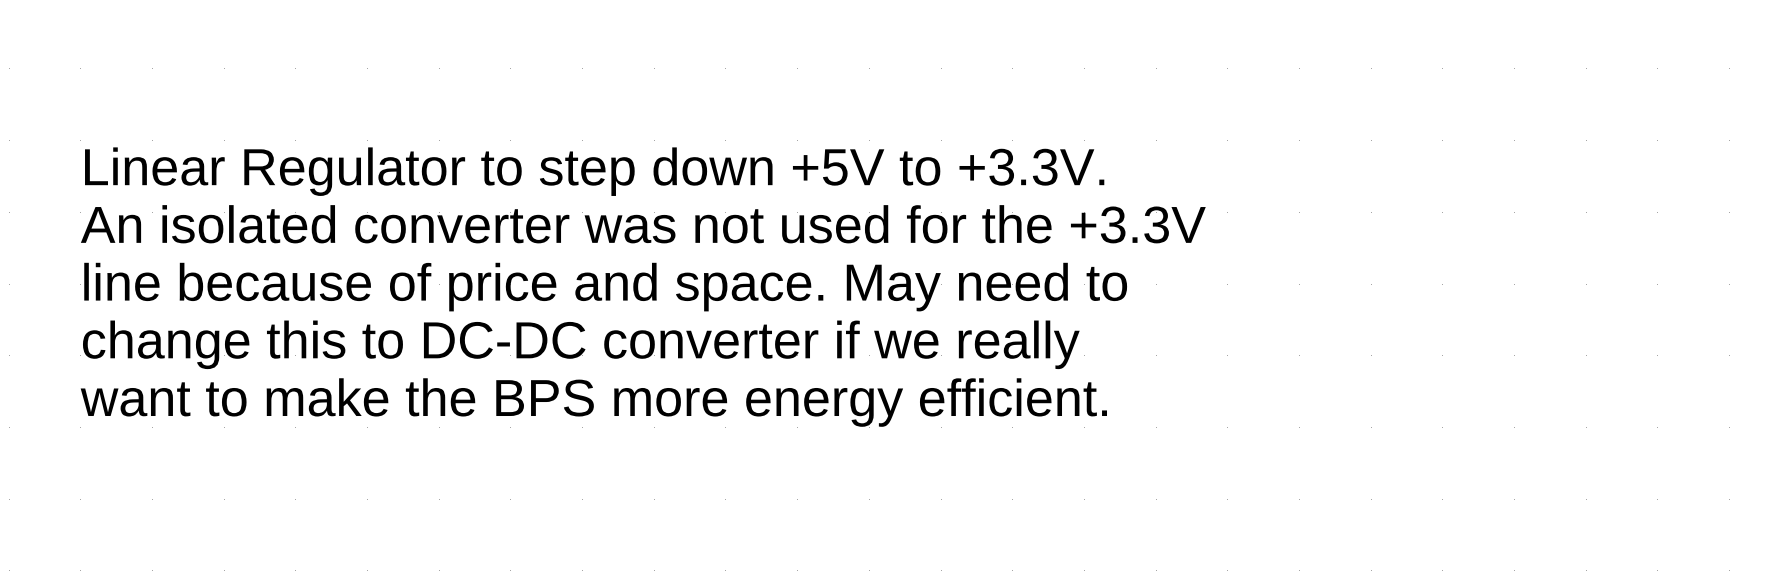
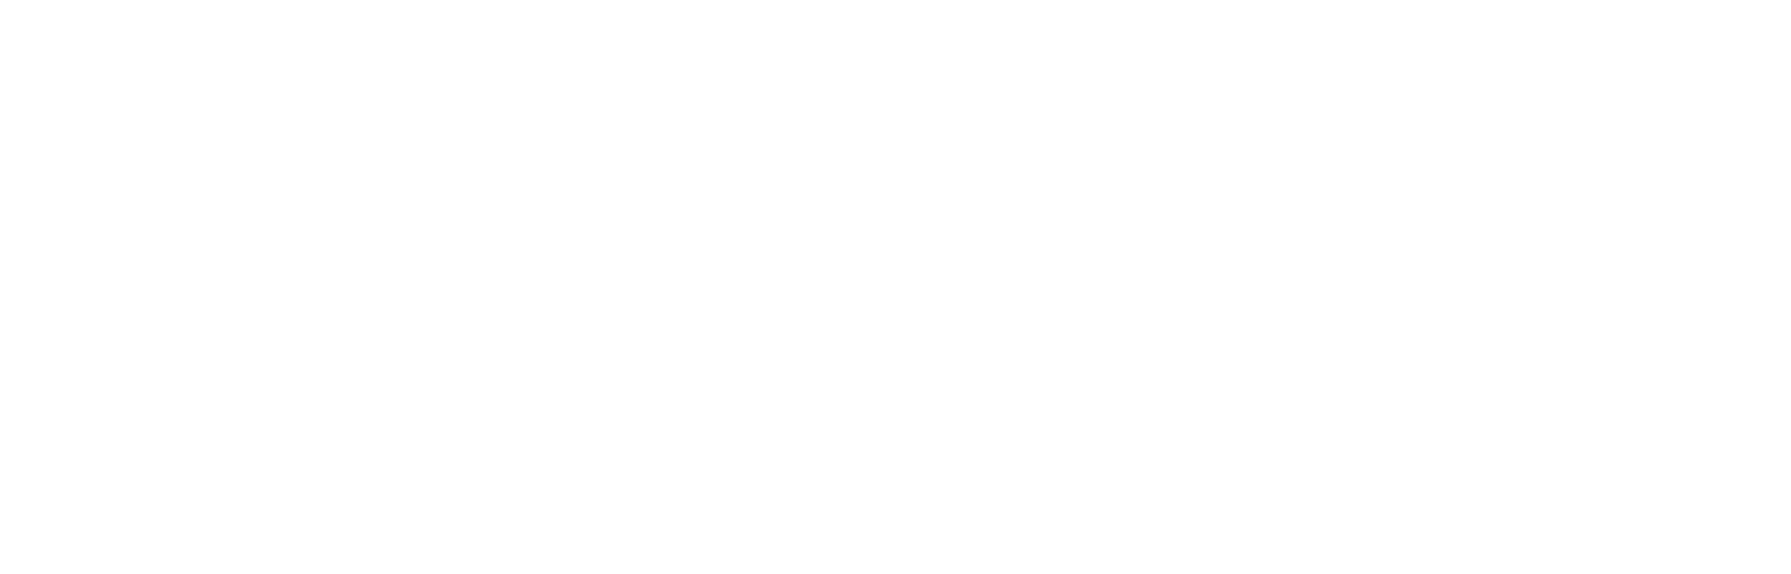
text: Linear Regulator to step down +5V to +3.3V. (594, 171) -> none
text: An isolated converter was not used for the +3.3V (643, 224) -> none
text: line because of price and space. May need to (605, 287) -> none
text: change this to DC-DC converter if we really (581, 344) -> none
text: want to make the BPS more energy efficient. (593, 402) -> none

